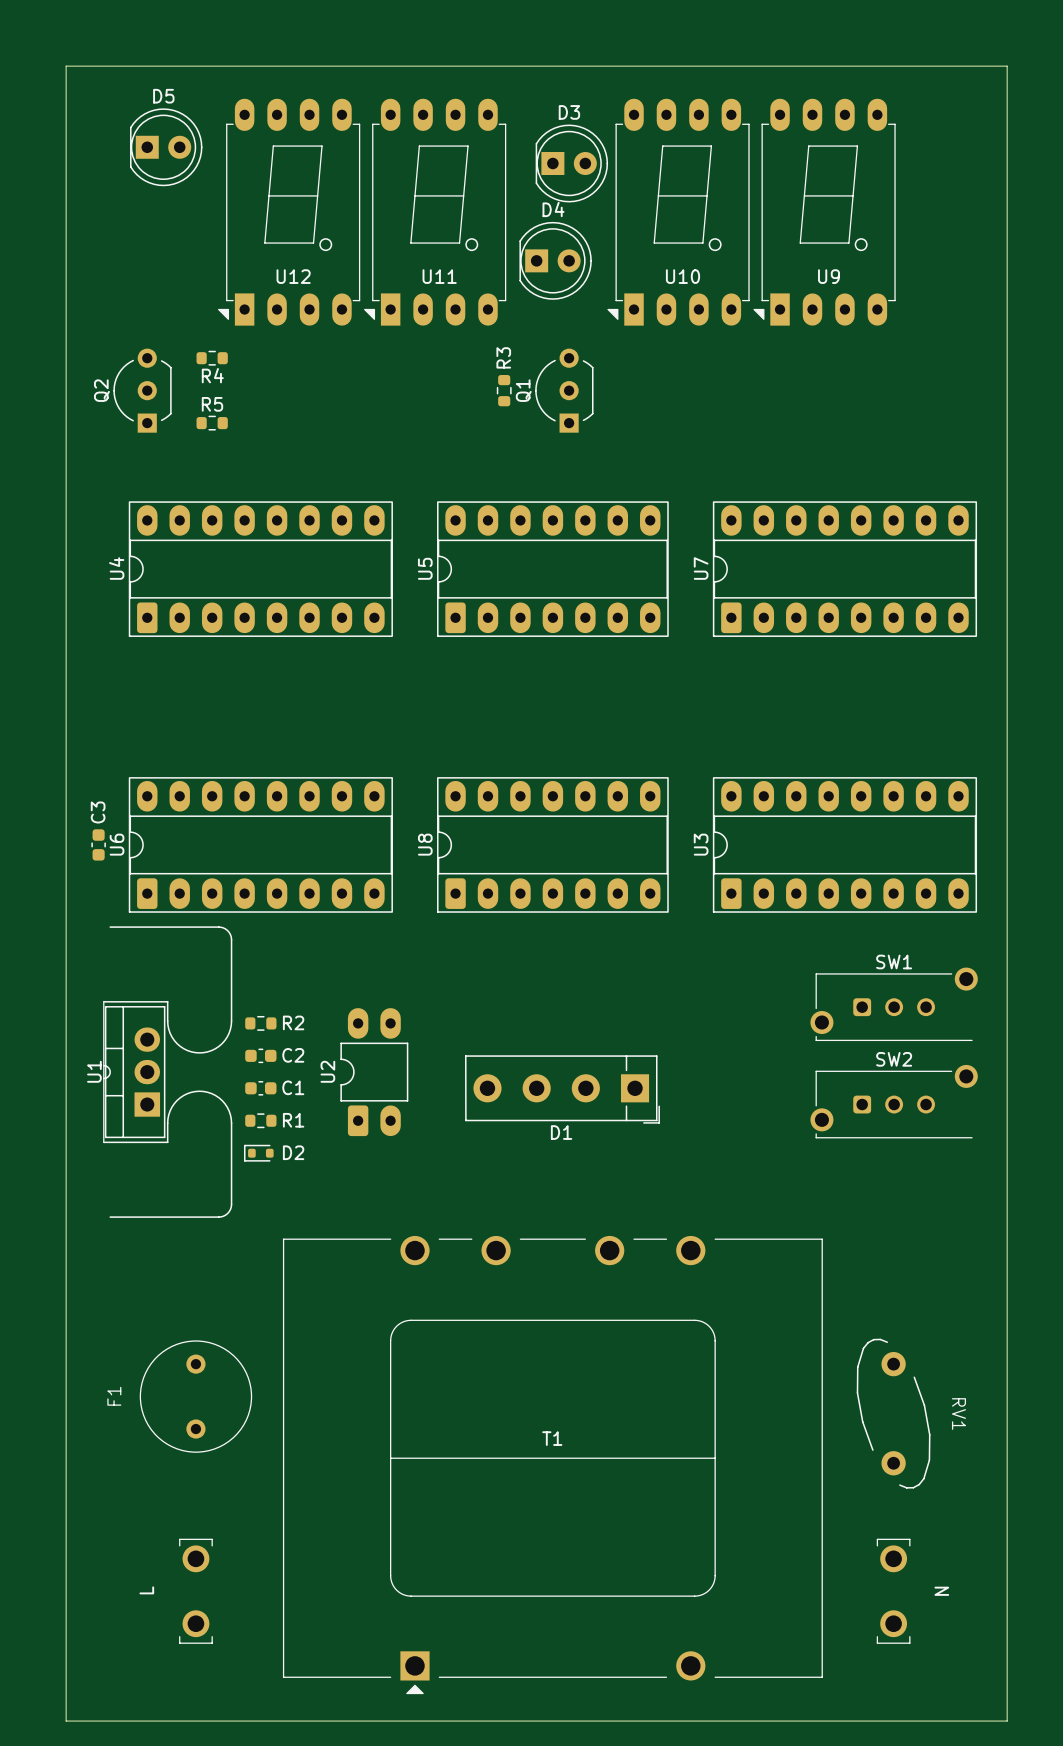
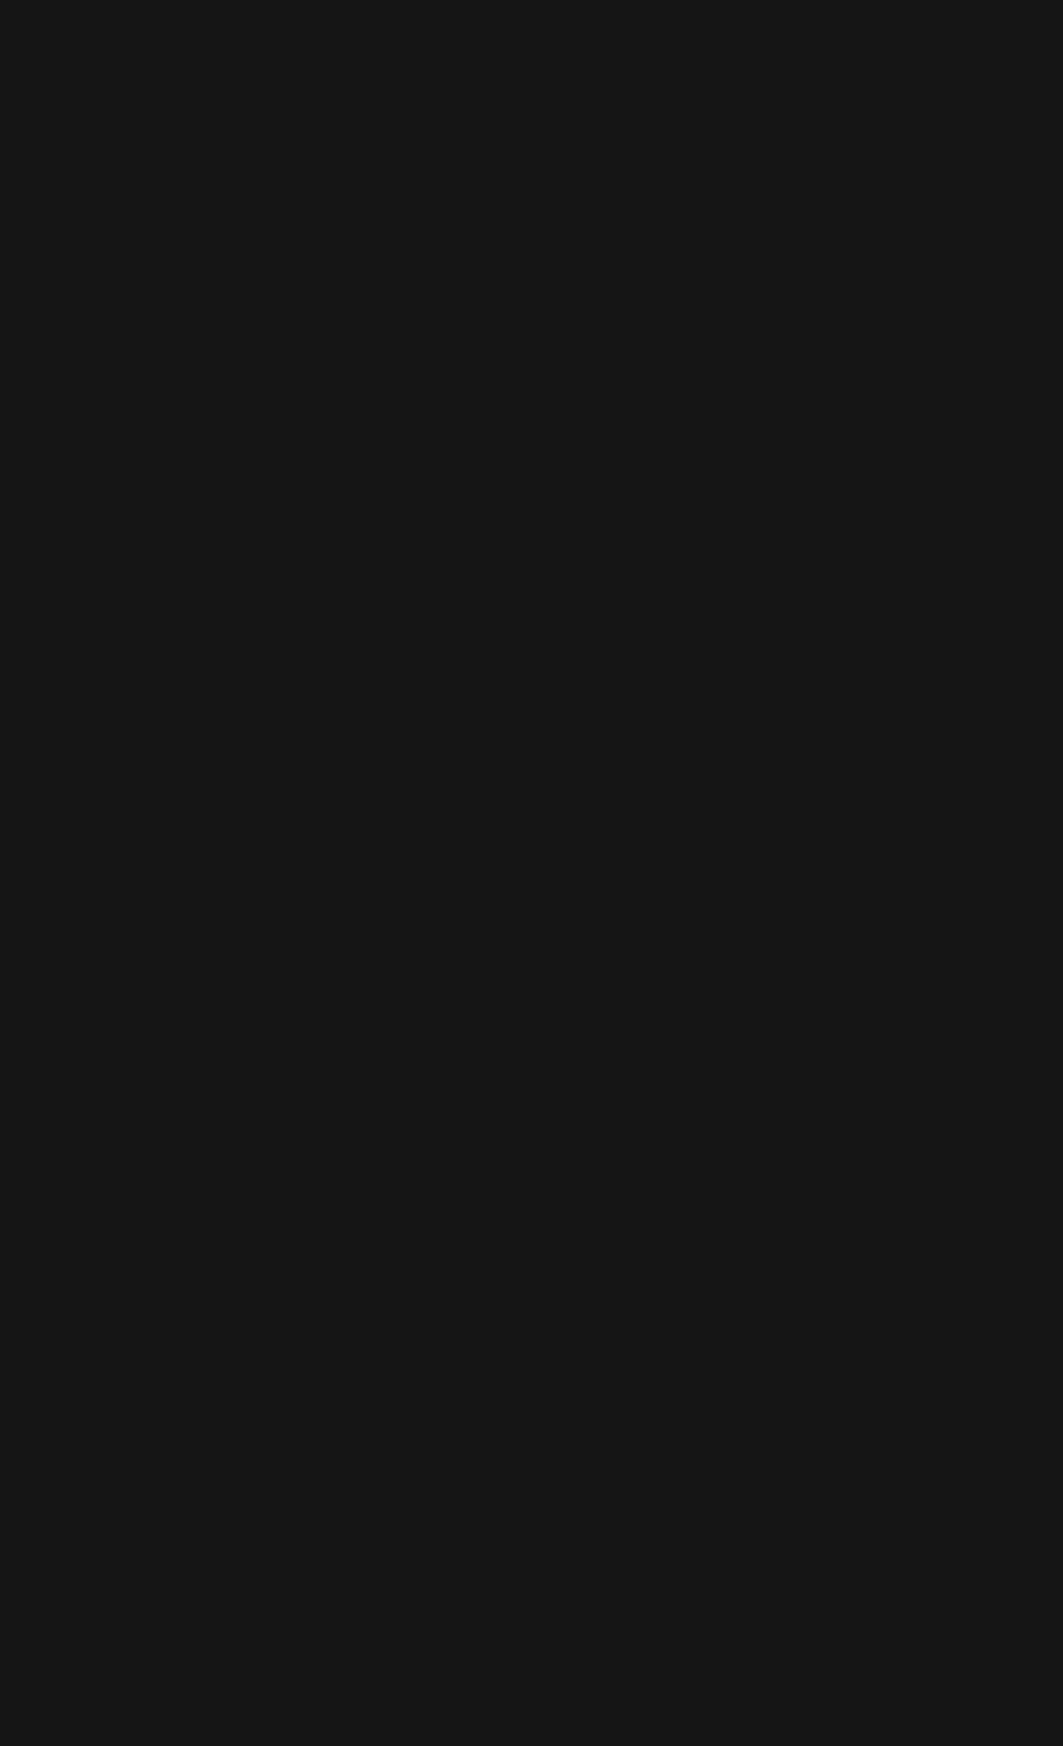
board edge: (66, 66) (1007, 66) (1007, 1721) (66, 1721) (66, 66) -> none
D5: (166, 147) -> none
D3: (571, 163) -> none
U12: (289, 212) -> none
U11: (435, 212) -> none
U10: (678, 212) -> none
U9: (824, 212) -> none
D4: (555, 260) -> none
R4: (212, 358) -> none
Q2: (142, 390) -> none
R3: (504, 390) -> none
Q1: (564, 390) -> none
R5: (212, 423) -> none
U4: (260, 569) -> none
U5: (552, 569) -> none
U7: (844, 569) -> none
C3: (98, 844) -> none
U6: (260, 844) -> none
U8: (552, 844) -> none
U3: (844, 844) -> none
drawing: [103, 926, 233, 1218] -> none
SW1: (894, 1004) -> none
R2: (260, 1023) -> none
C2: (260, 1055) -> none
U1: (135, 1072) -> none
U2: (374, 1072) -> none
C1: (260, 1088) -> none
D1: (562, 1089) -> none
SW2: (894, 1101) -> none
R1: (260, 1120) -> none
D2: (258, 1153) -> none
F1: (195, 1396) -> none
RV1: (893, 1413) -> none
T1: (552, 1465) -> none
part: L (195, 1591) -> none
part: N (893, 1591) -> none

